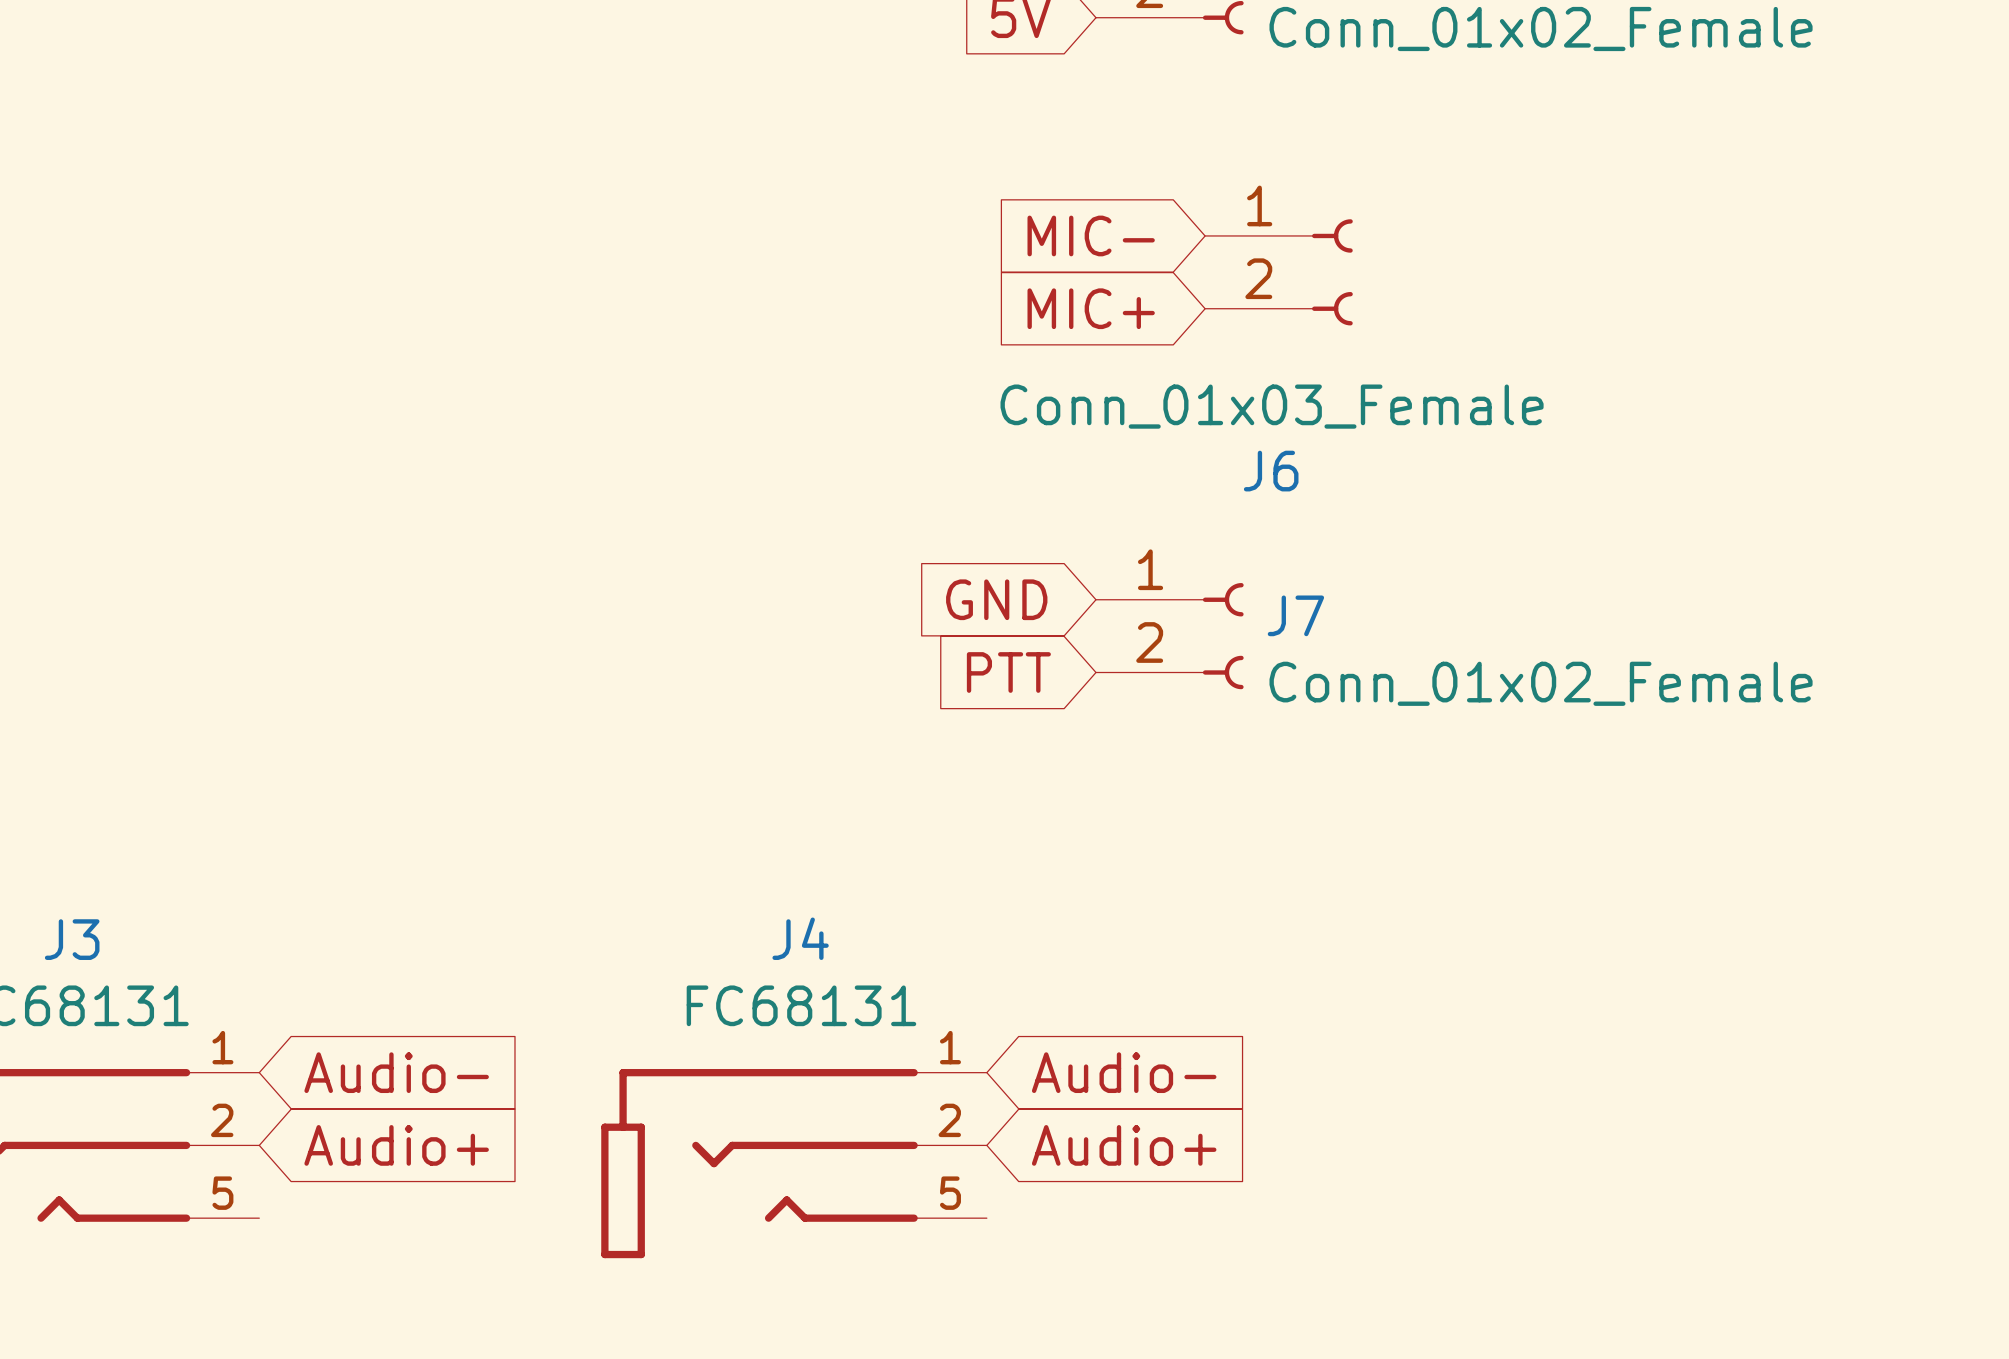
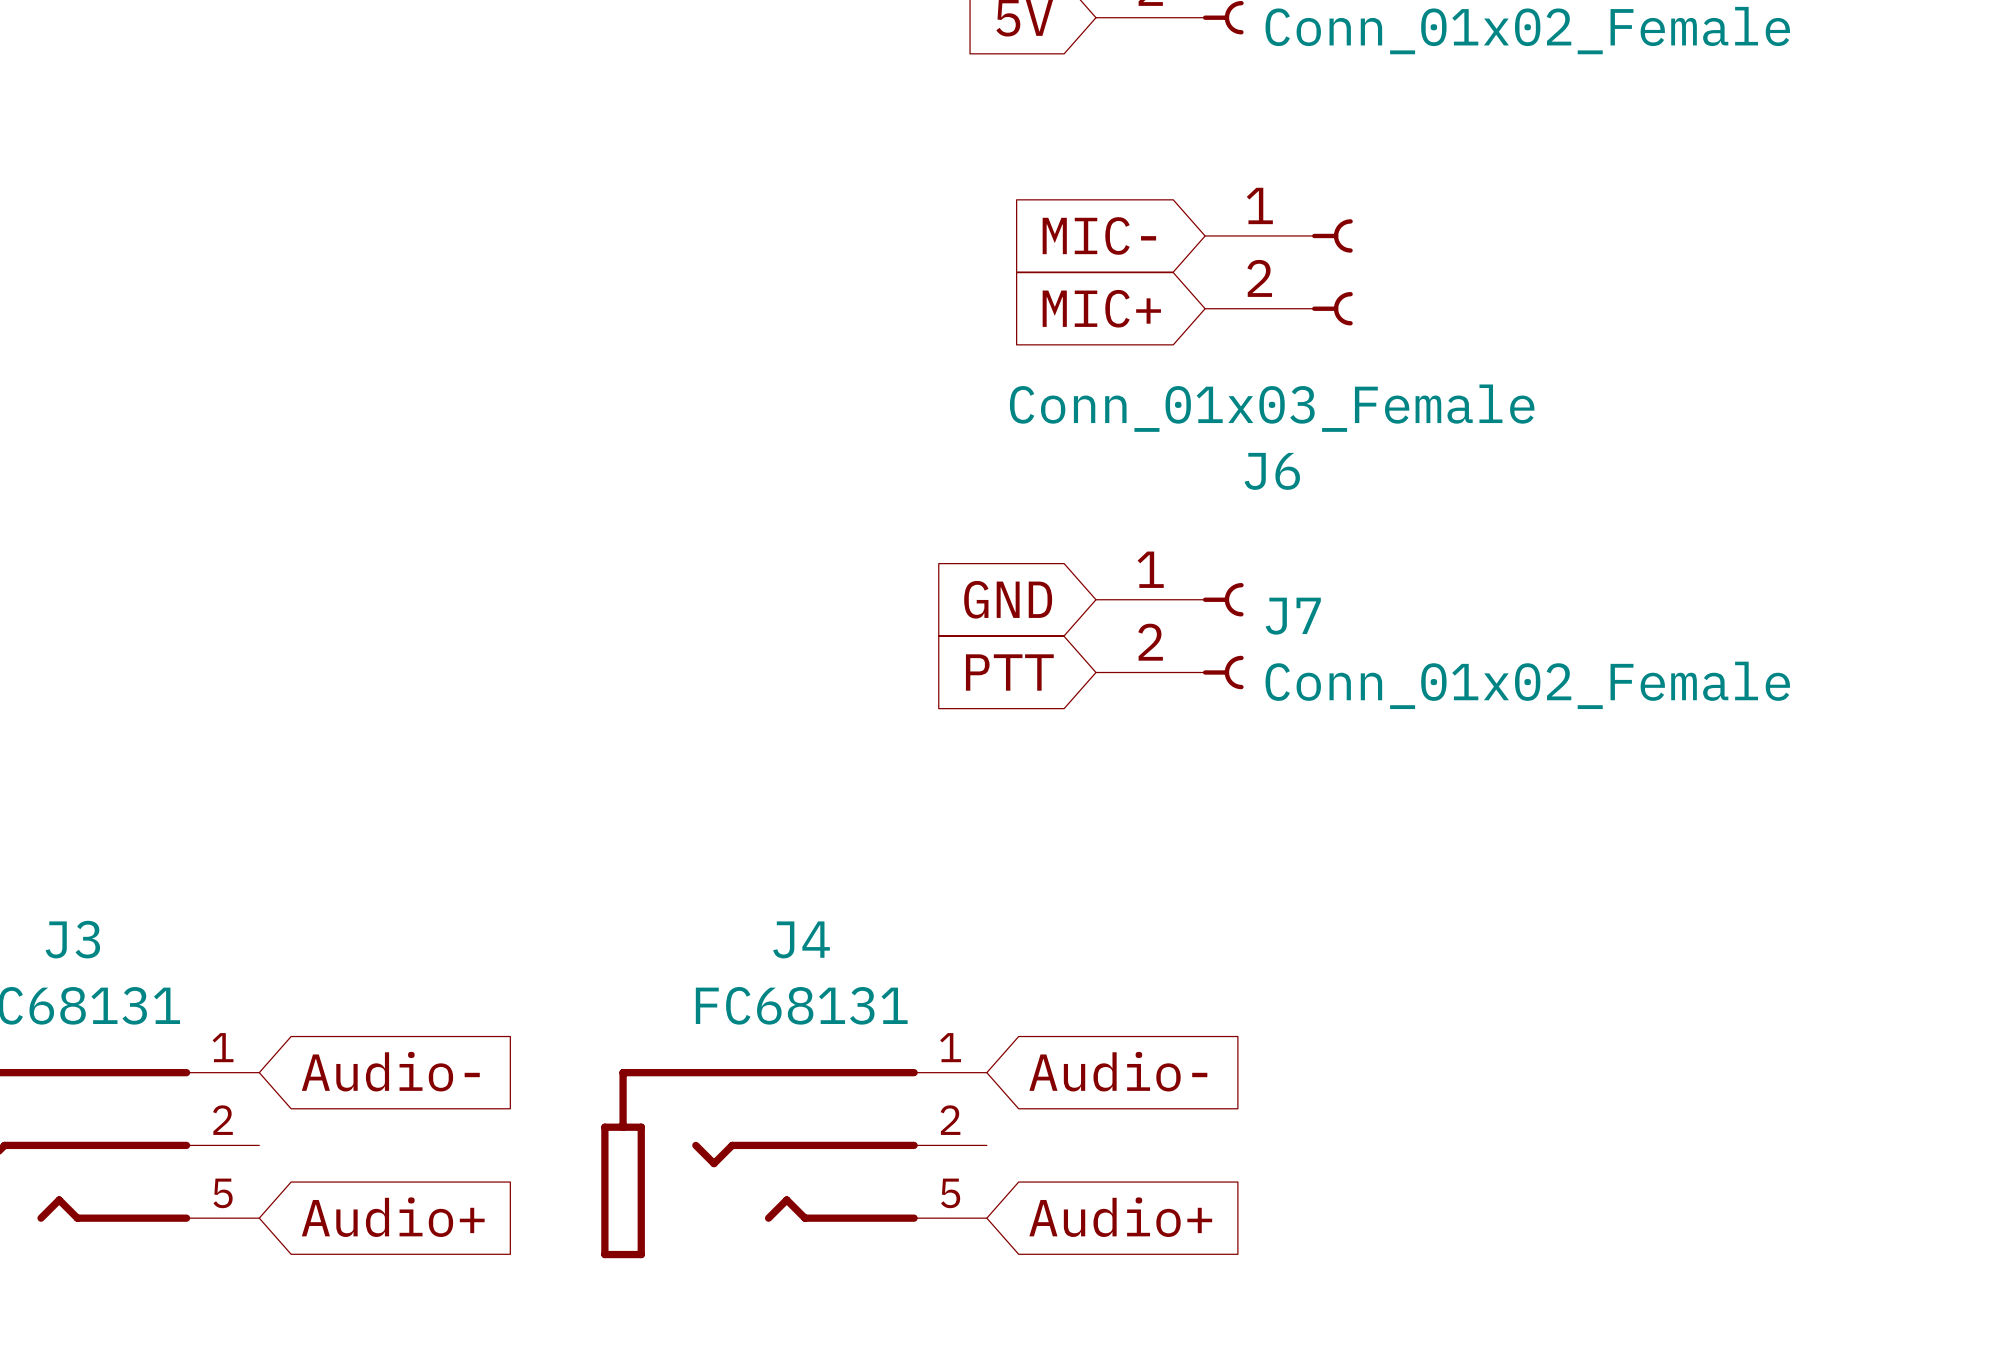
global label position: Audio+ (396, 1145) -> Audio+ (393, 1217)
global label position: Audio+ (1124, 1145) -> Audio+ (1120, 1217)

